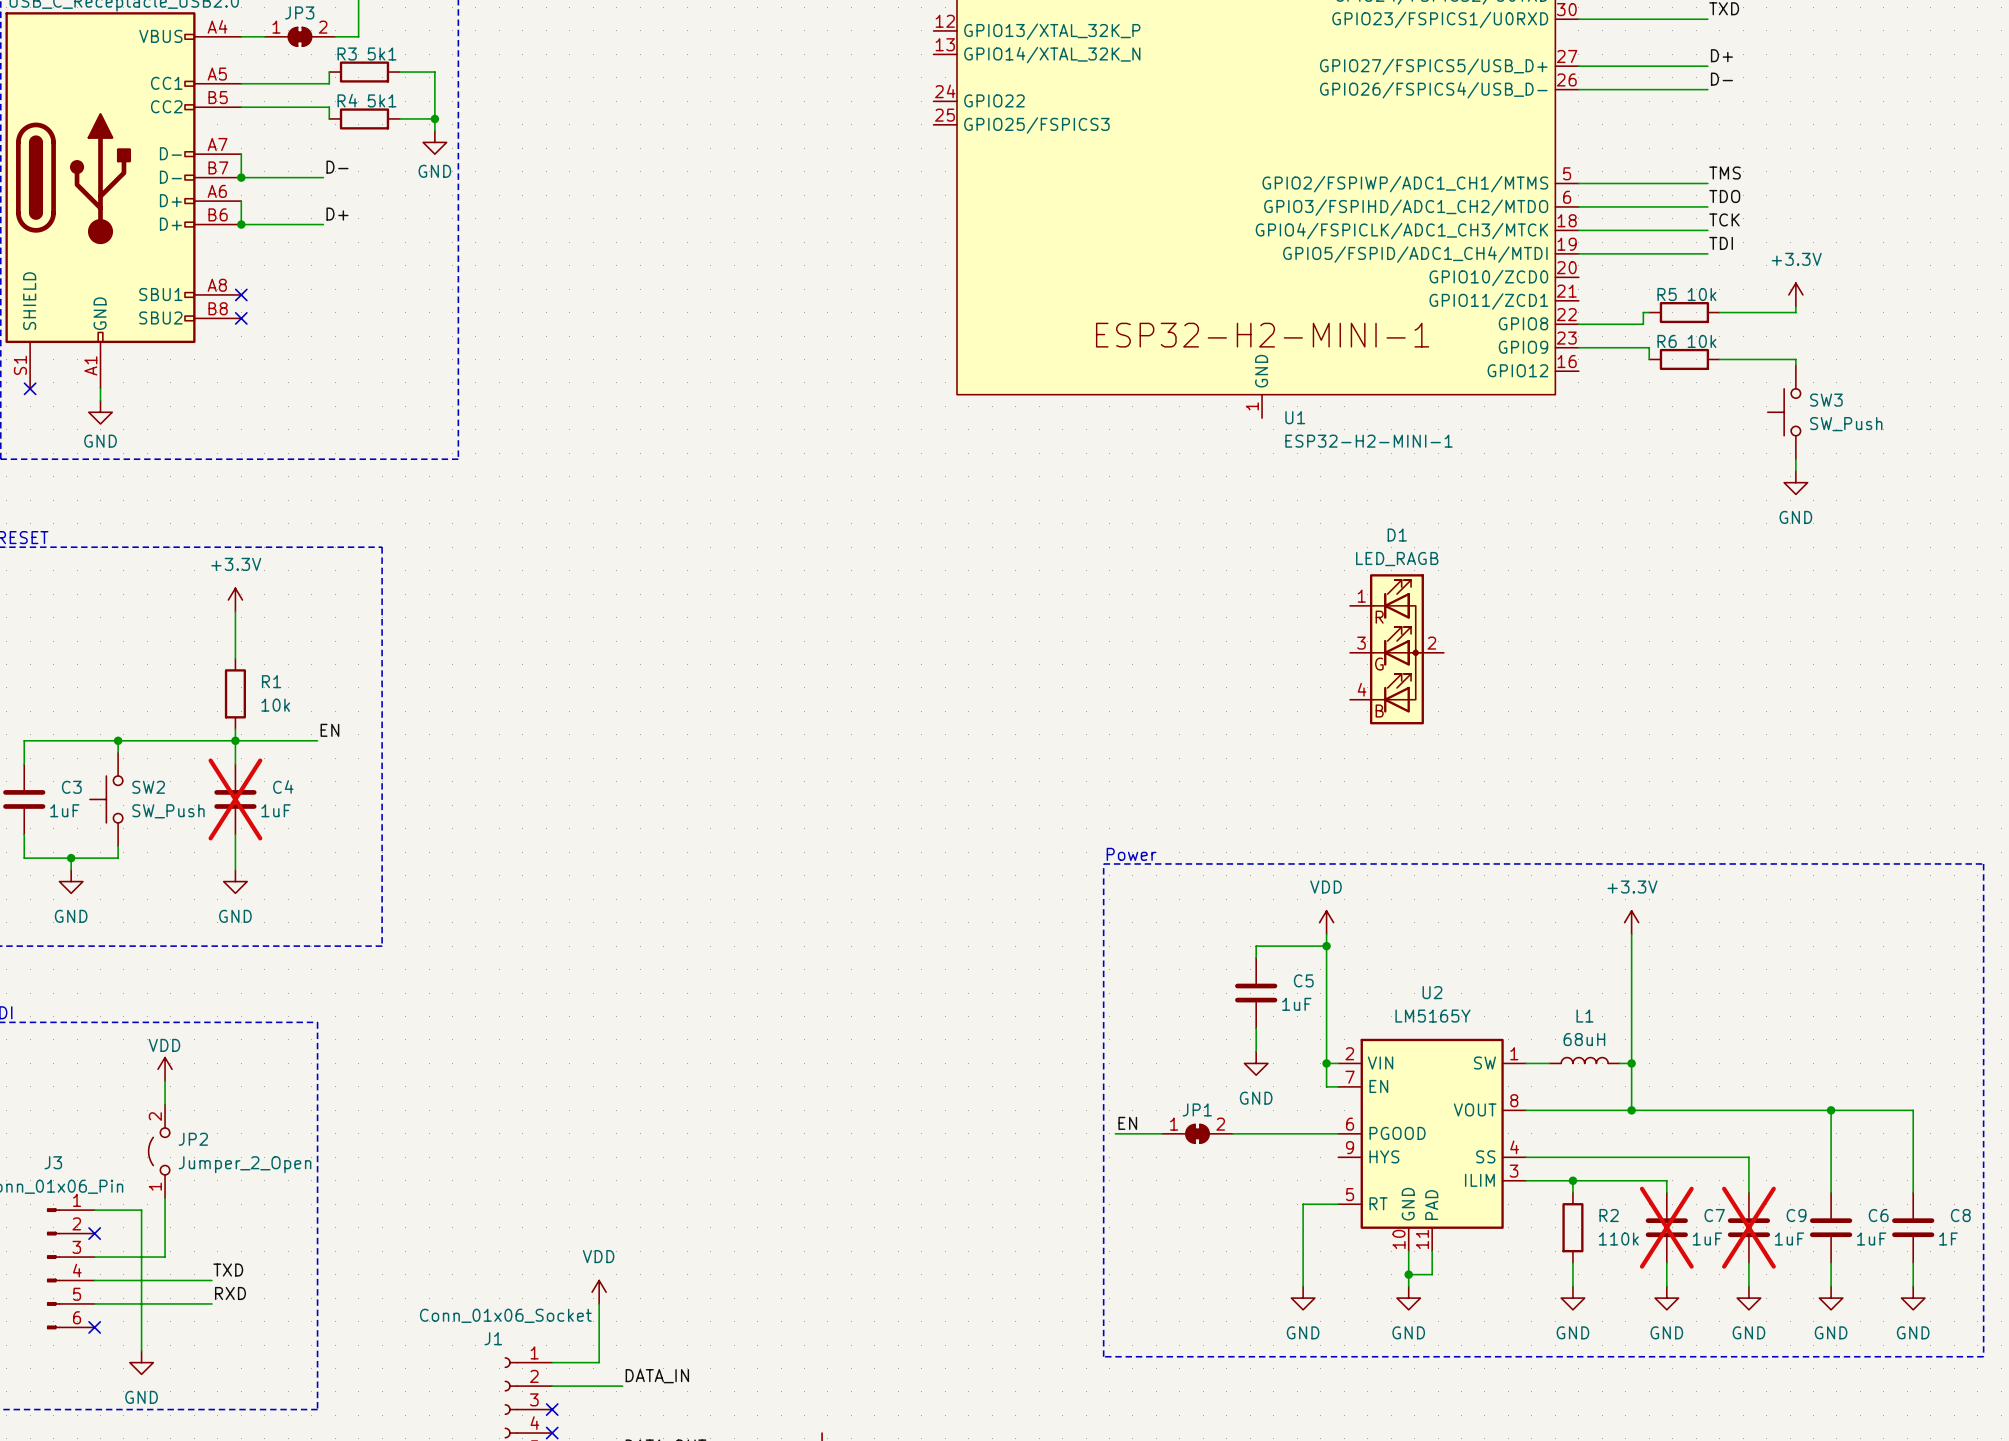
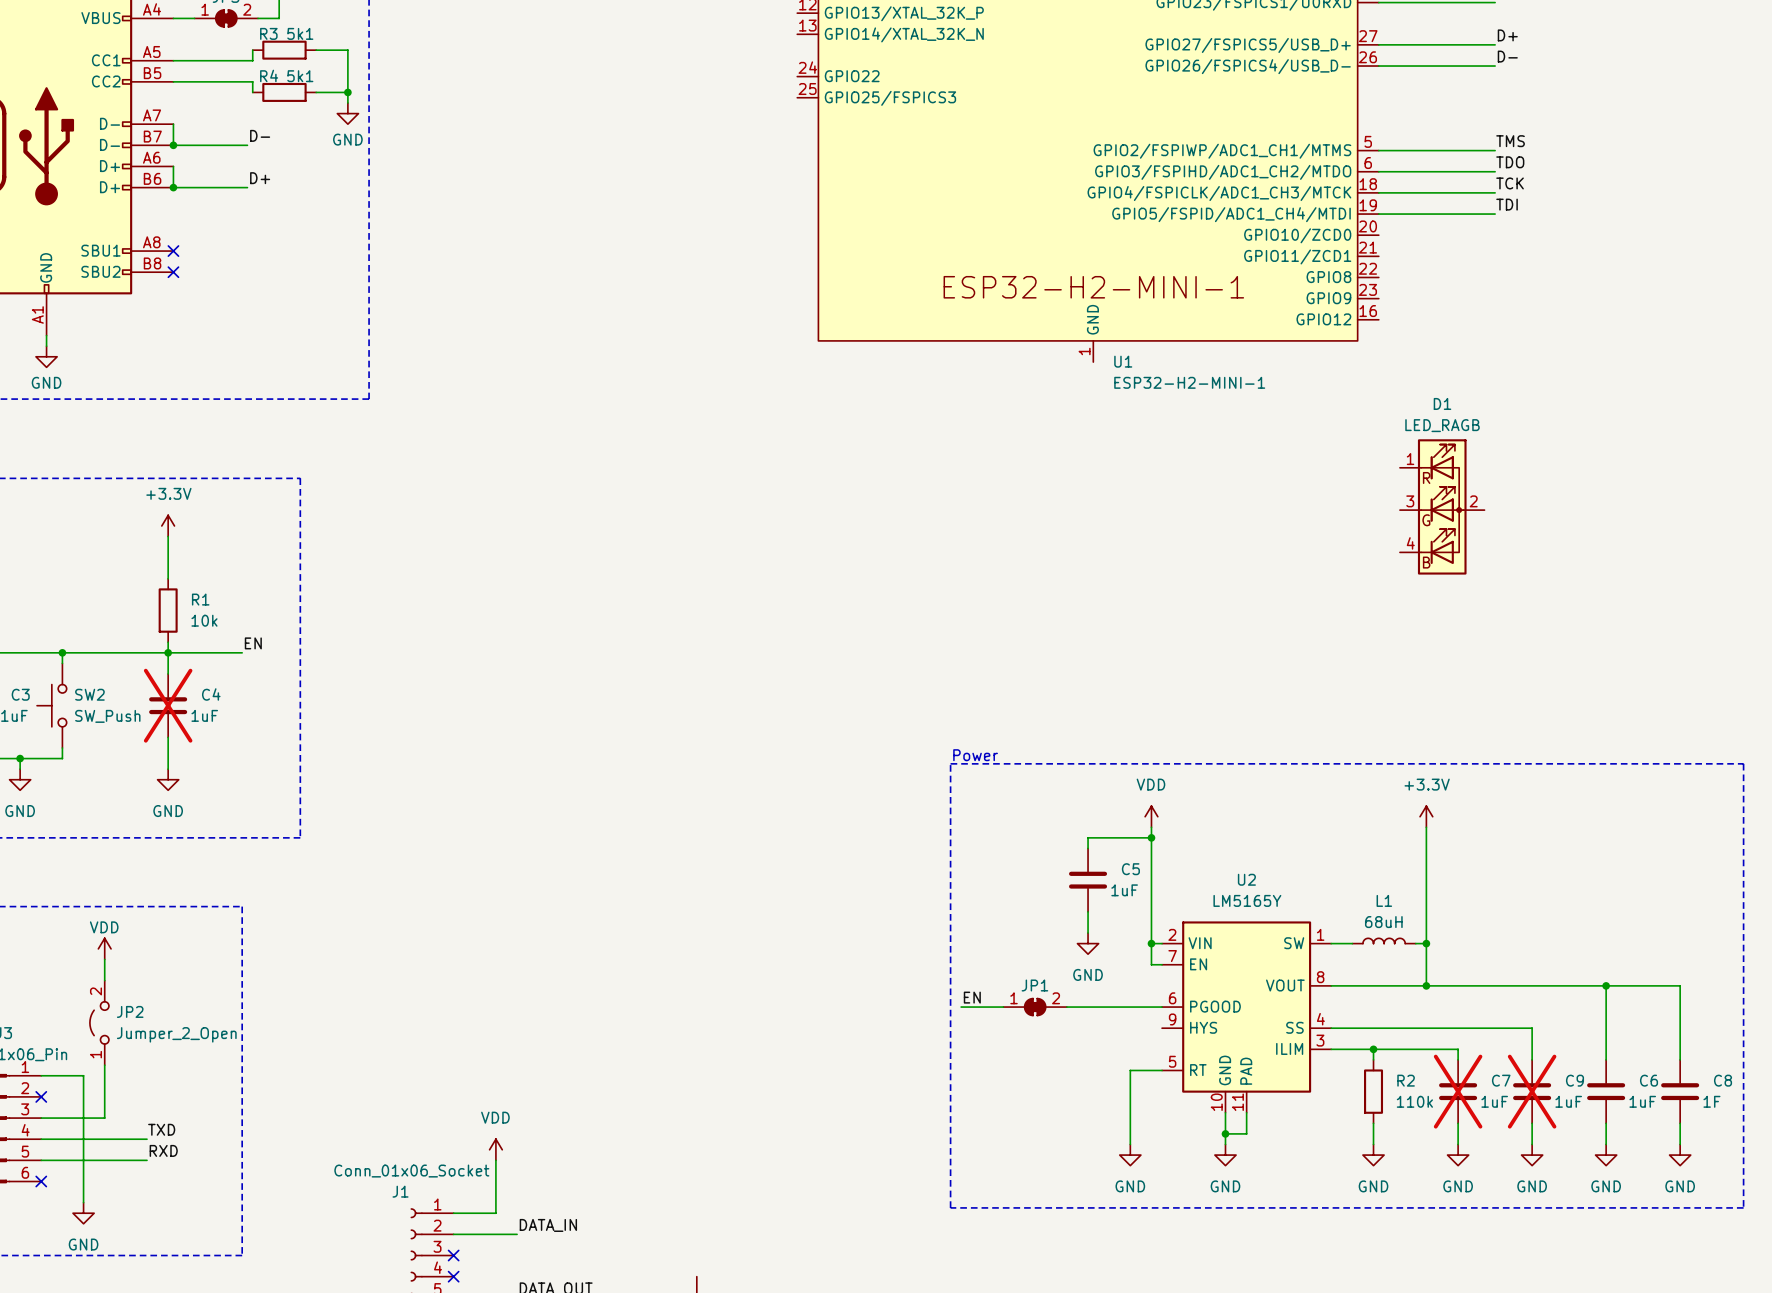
power symbol: +3.3V (1795, 294) -> none
wire: (1795, 306) (1795, 312) (1719, 312) -> none
wire: (1649, 312) (1643, 312) (1643, 324) (1578, 324) -> none
R5: 10k (1684, 312) -> none
wire: (1578, 347) (1649, 347) (1649, 359) -> none
R6: 10k (1684, 359) -> none
wire: (1719, 359) (1795, 359) (1795, 365) -> none
SW3: SW_Push (1784, 412) -> none
wire: (1795, 459) (1795, 470) -> none
power symbol: GND (1795, 482) -> none
D1 position: (1396, 649) -> (1442, 506)

